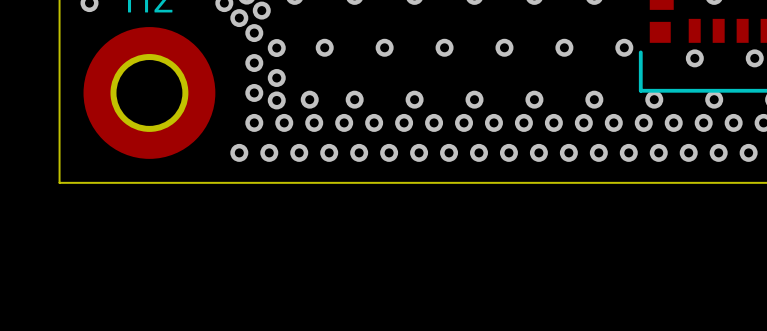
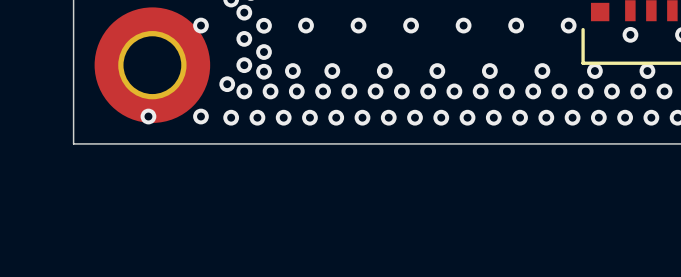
via: none -> (200, 25)
via: none -> (227, 84)
via: none -> (148, 116)
via: none -> (200, 116)

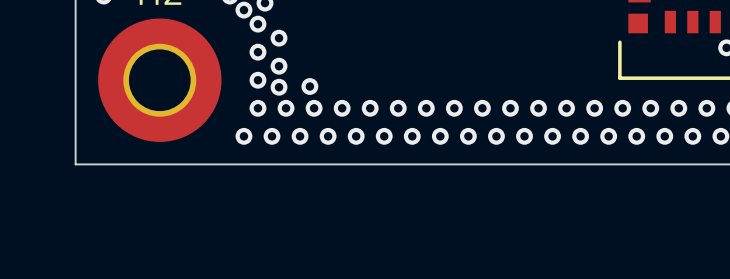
via: (200, 25) -> none
via: (306, 25) -> none
via: (358, 25) -> none
via: (411, 25) -> none
via: (463, 25) -> none
via: (516, 25) -> none
via: (568, 25) -> none
via: (630, 34) -> none
via: (332, 71) -> none
via: (384, 71) -> none
via: (437, 71) -> none
via: (489, 71) -> none
via: (542, 71) -> none
via: (594, 71) -> none
via: (647, 71) -> none
via: (227, 84) -> none
via: (148, 116) -> none
via: (200, 116) -> none

